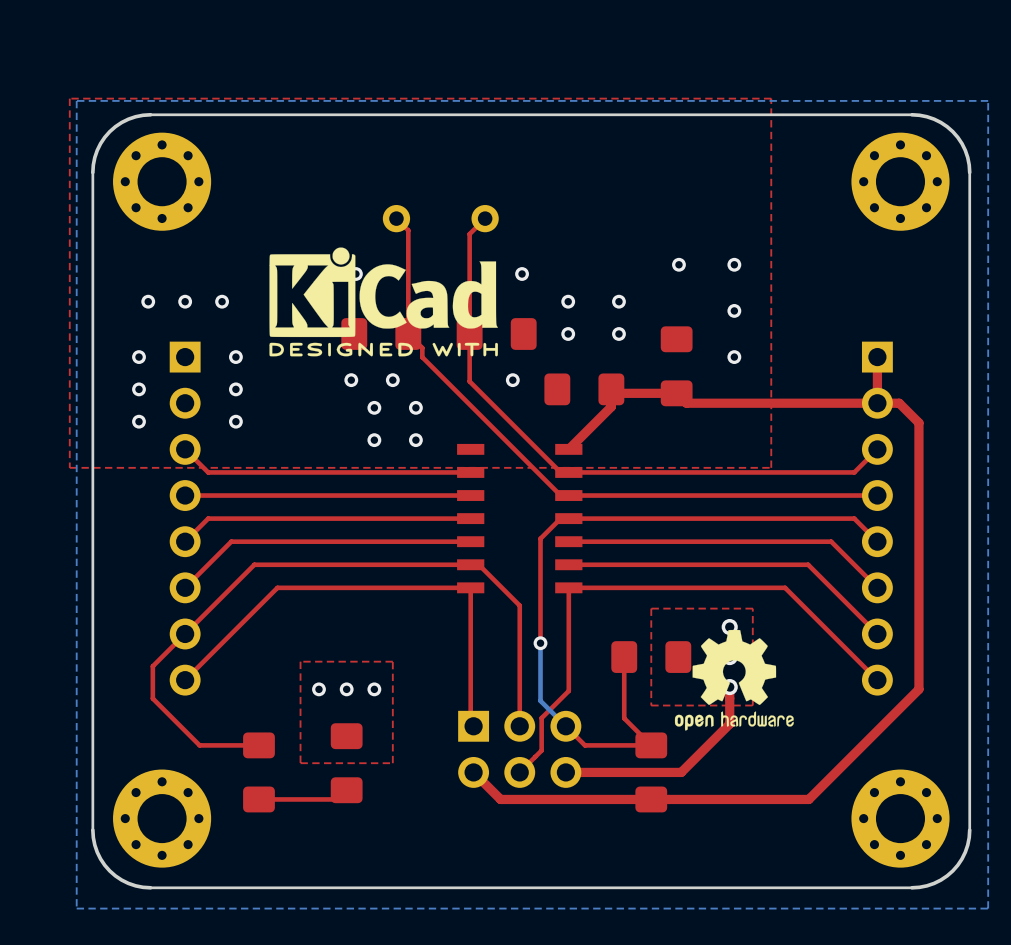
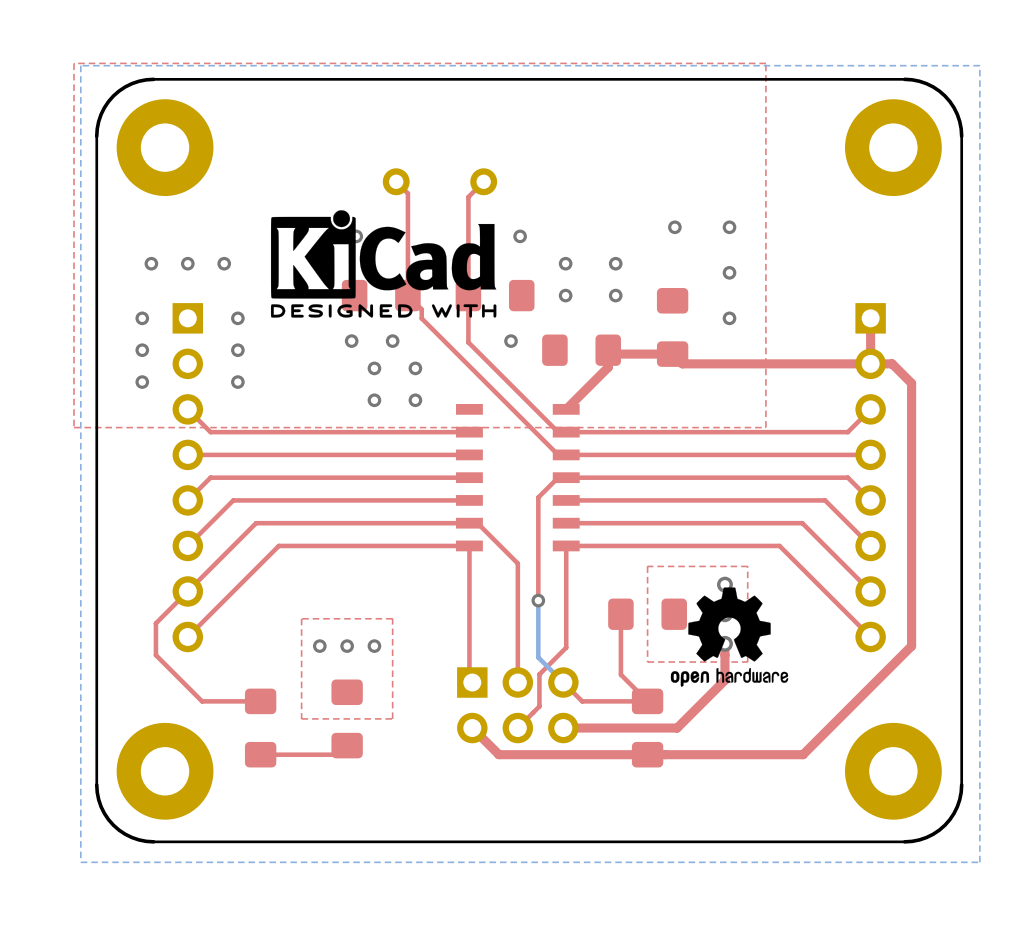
part footprint: [113, 132, 212, 231] -> [116, 99, 214, 197]
part footprint: [851, 132, 950, 231] -> [845, 99, 942, 197]
part footprint: [113, 769, 212, 868] -> [116, 722, 214, 820]
part footprint: [851, 769, 950, 868] -> [845, 722, 942, 820]

